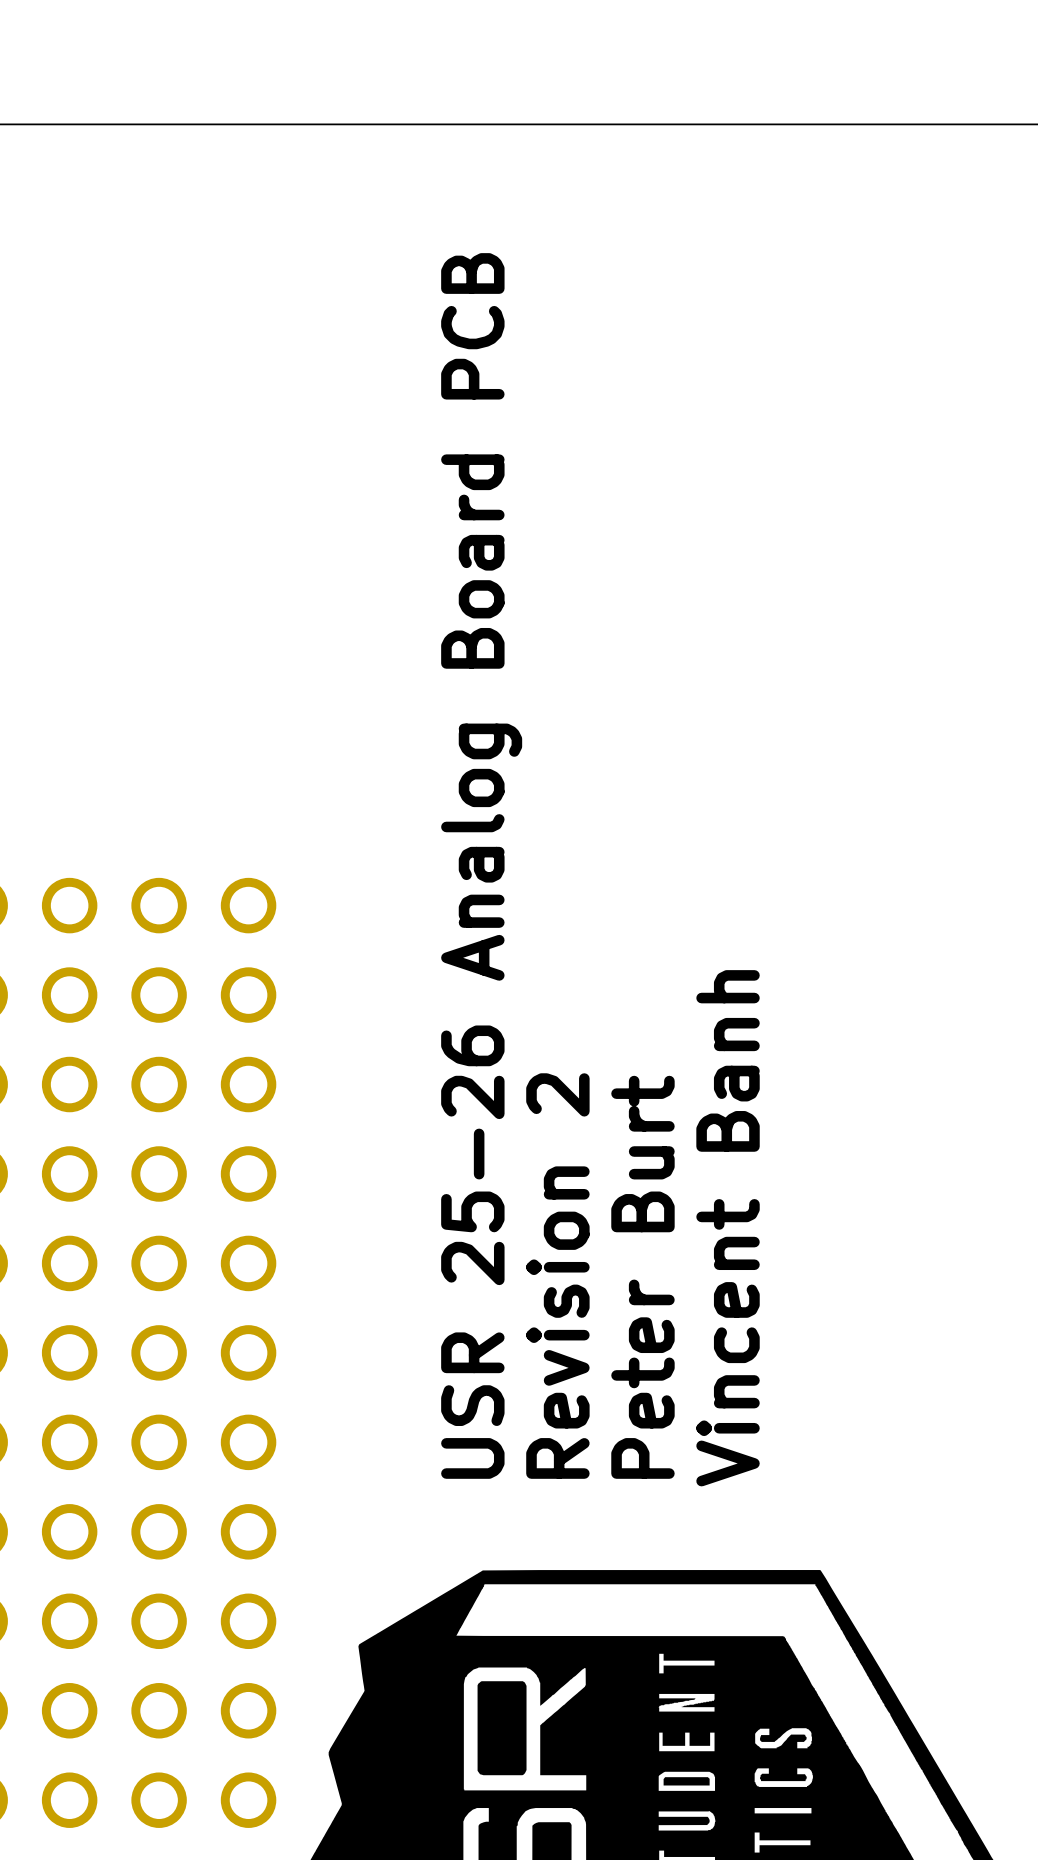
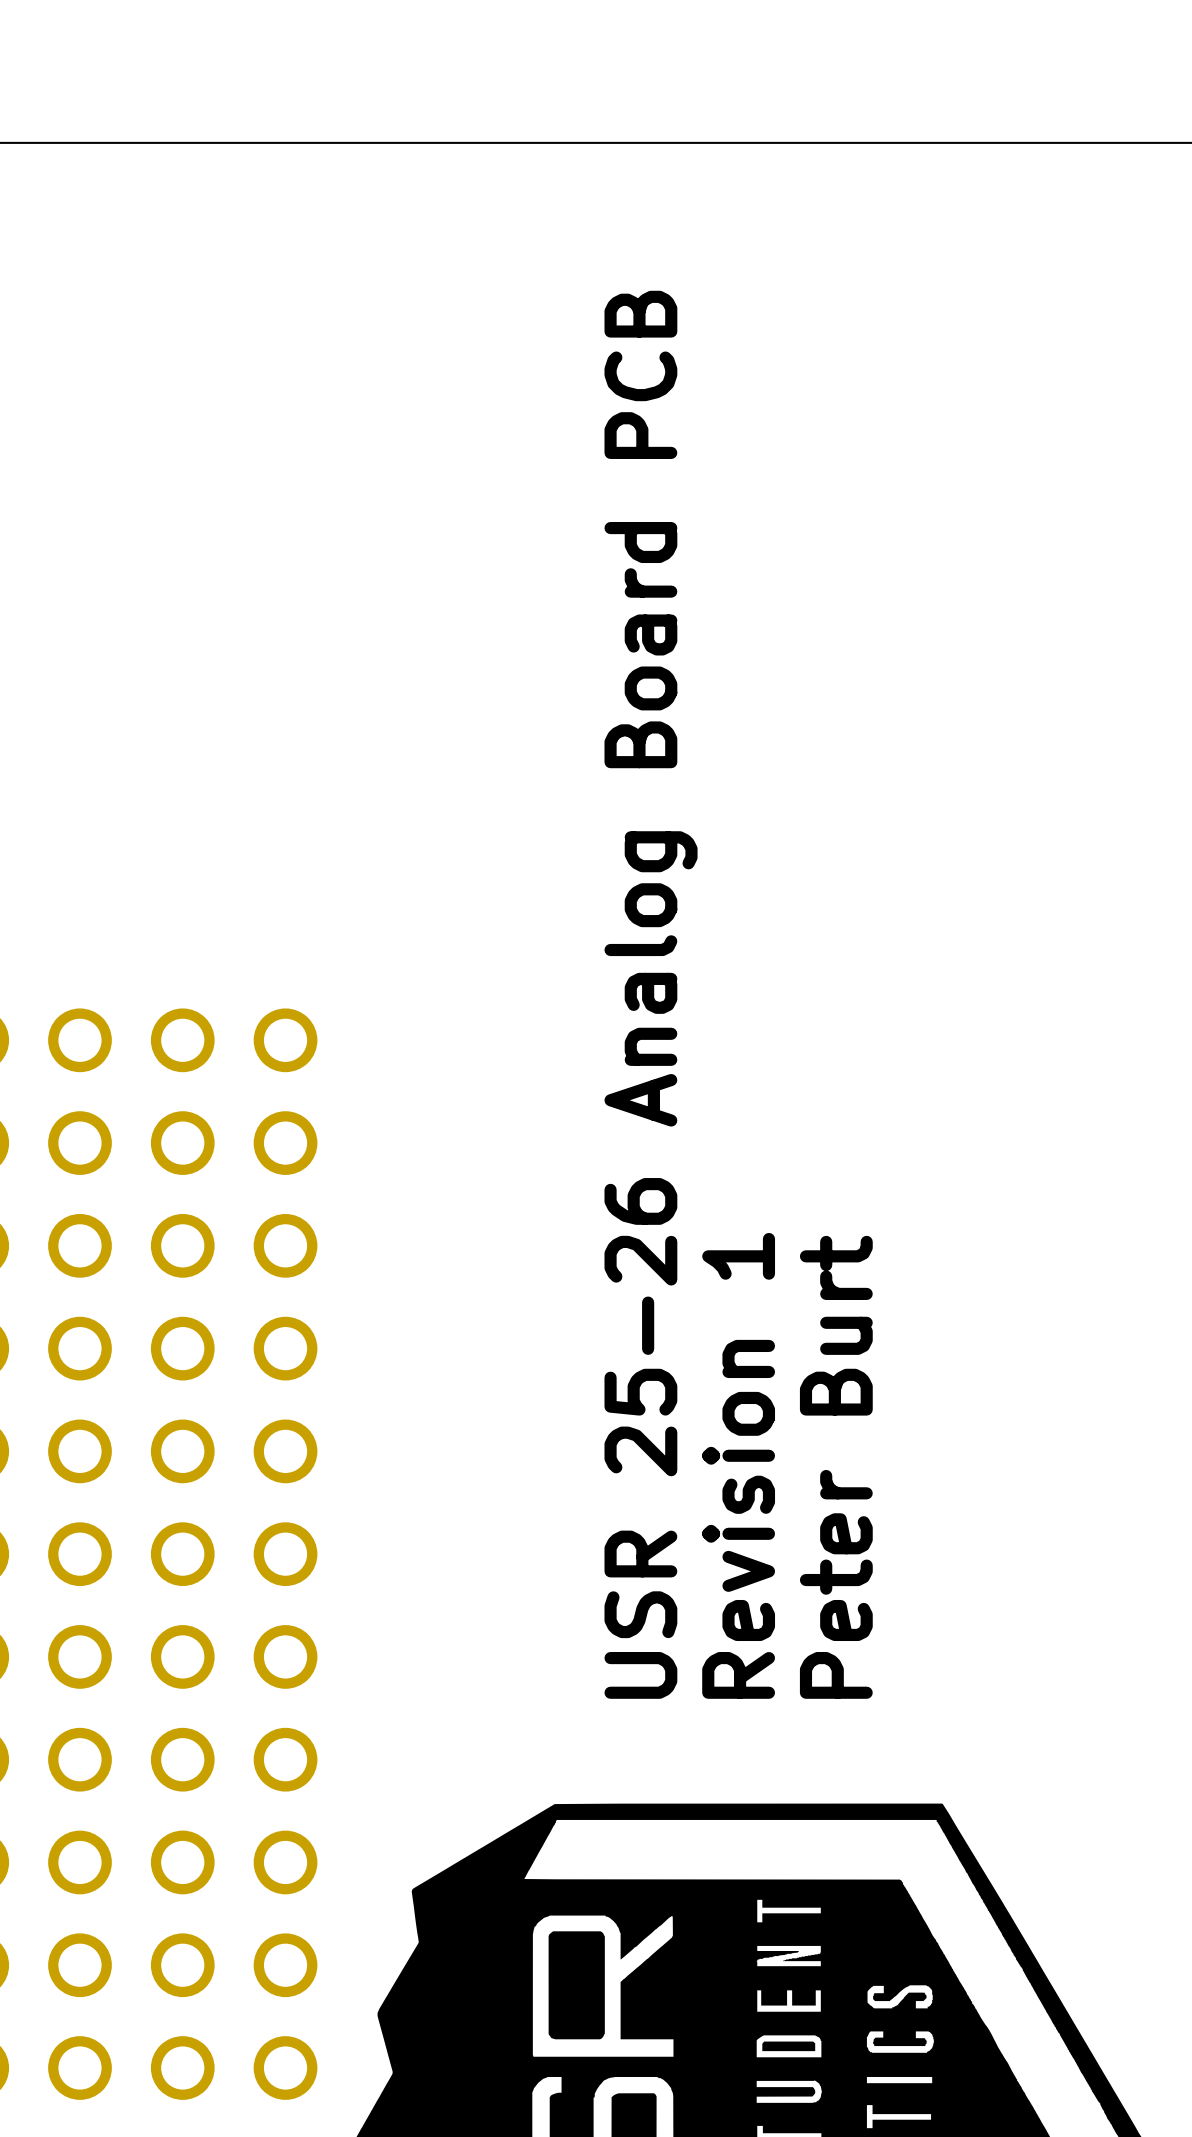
text: USR 25-26 Analog Board PCB (481, 865) -> none
text: Vincent Banh (728, 1228) -> Peter Burt (836, 1467)
text: Revision 2 (557, 1276) -> USR 25-26 Analog Board PCB (651, 994)
text: Peter Burt (642, 1277) -> Revision 1 (738, 1465)

